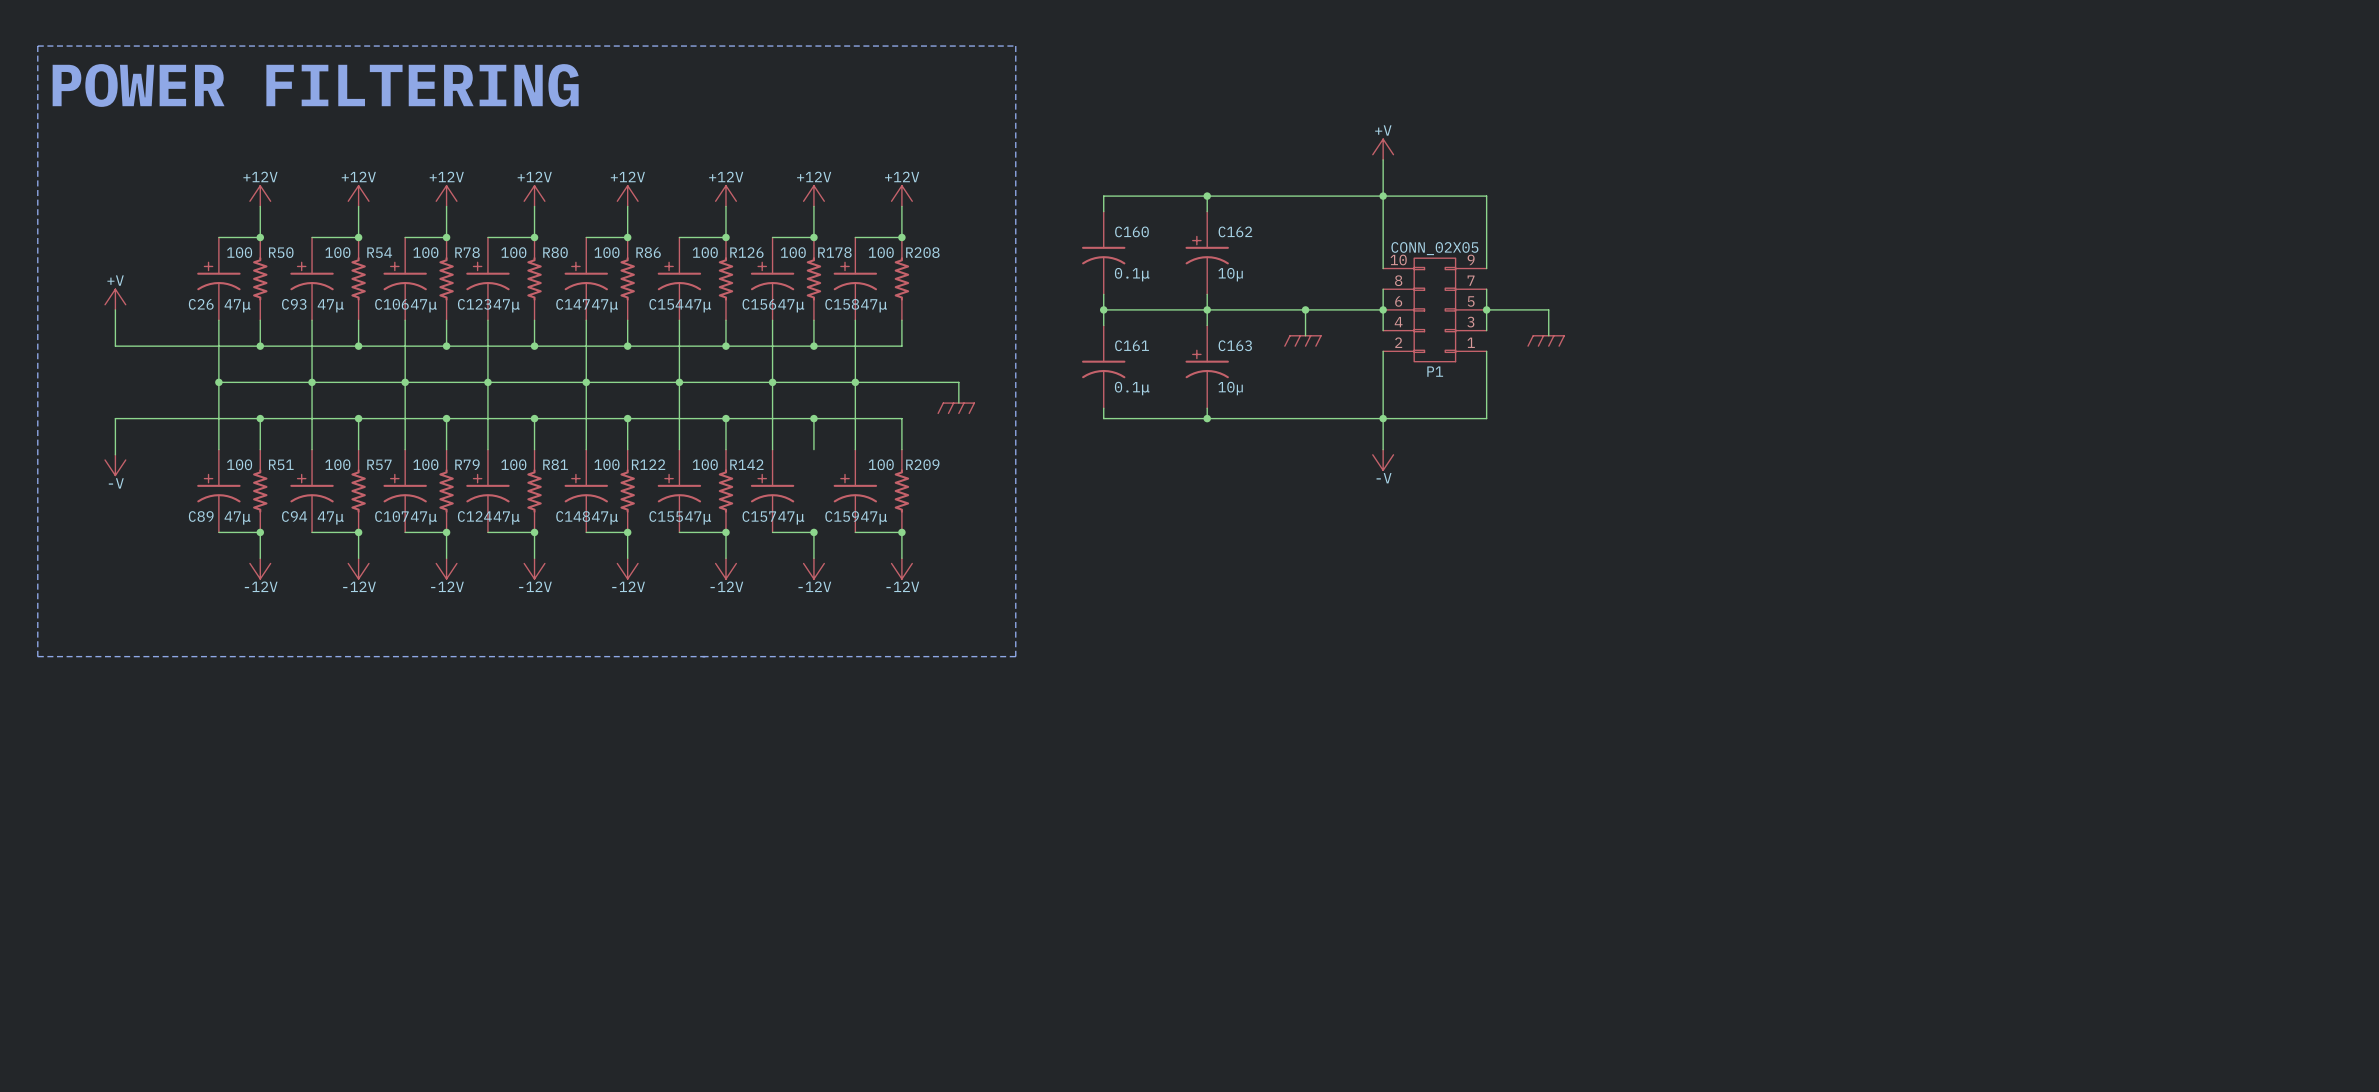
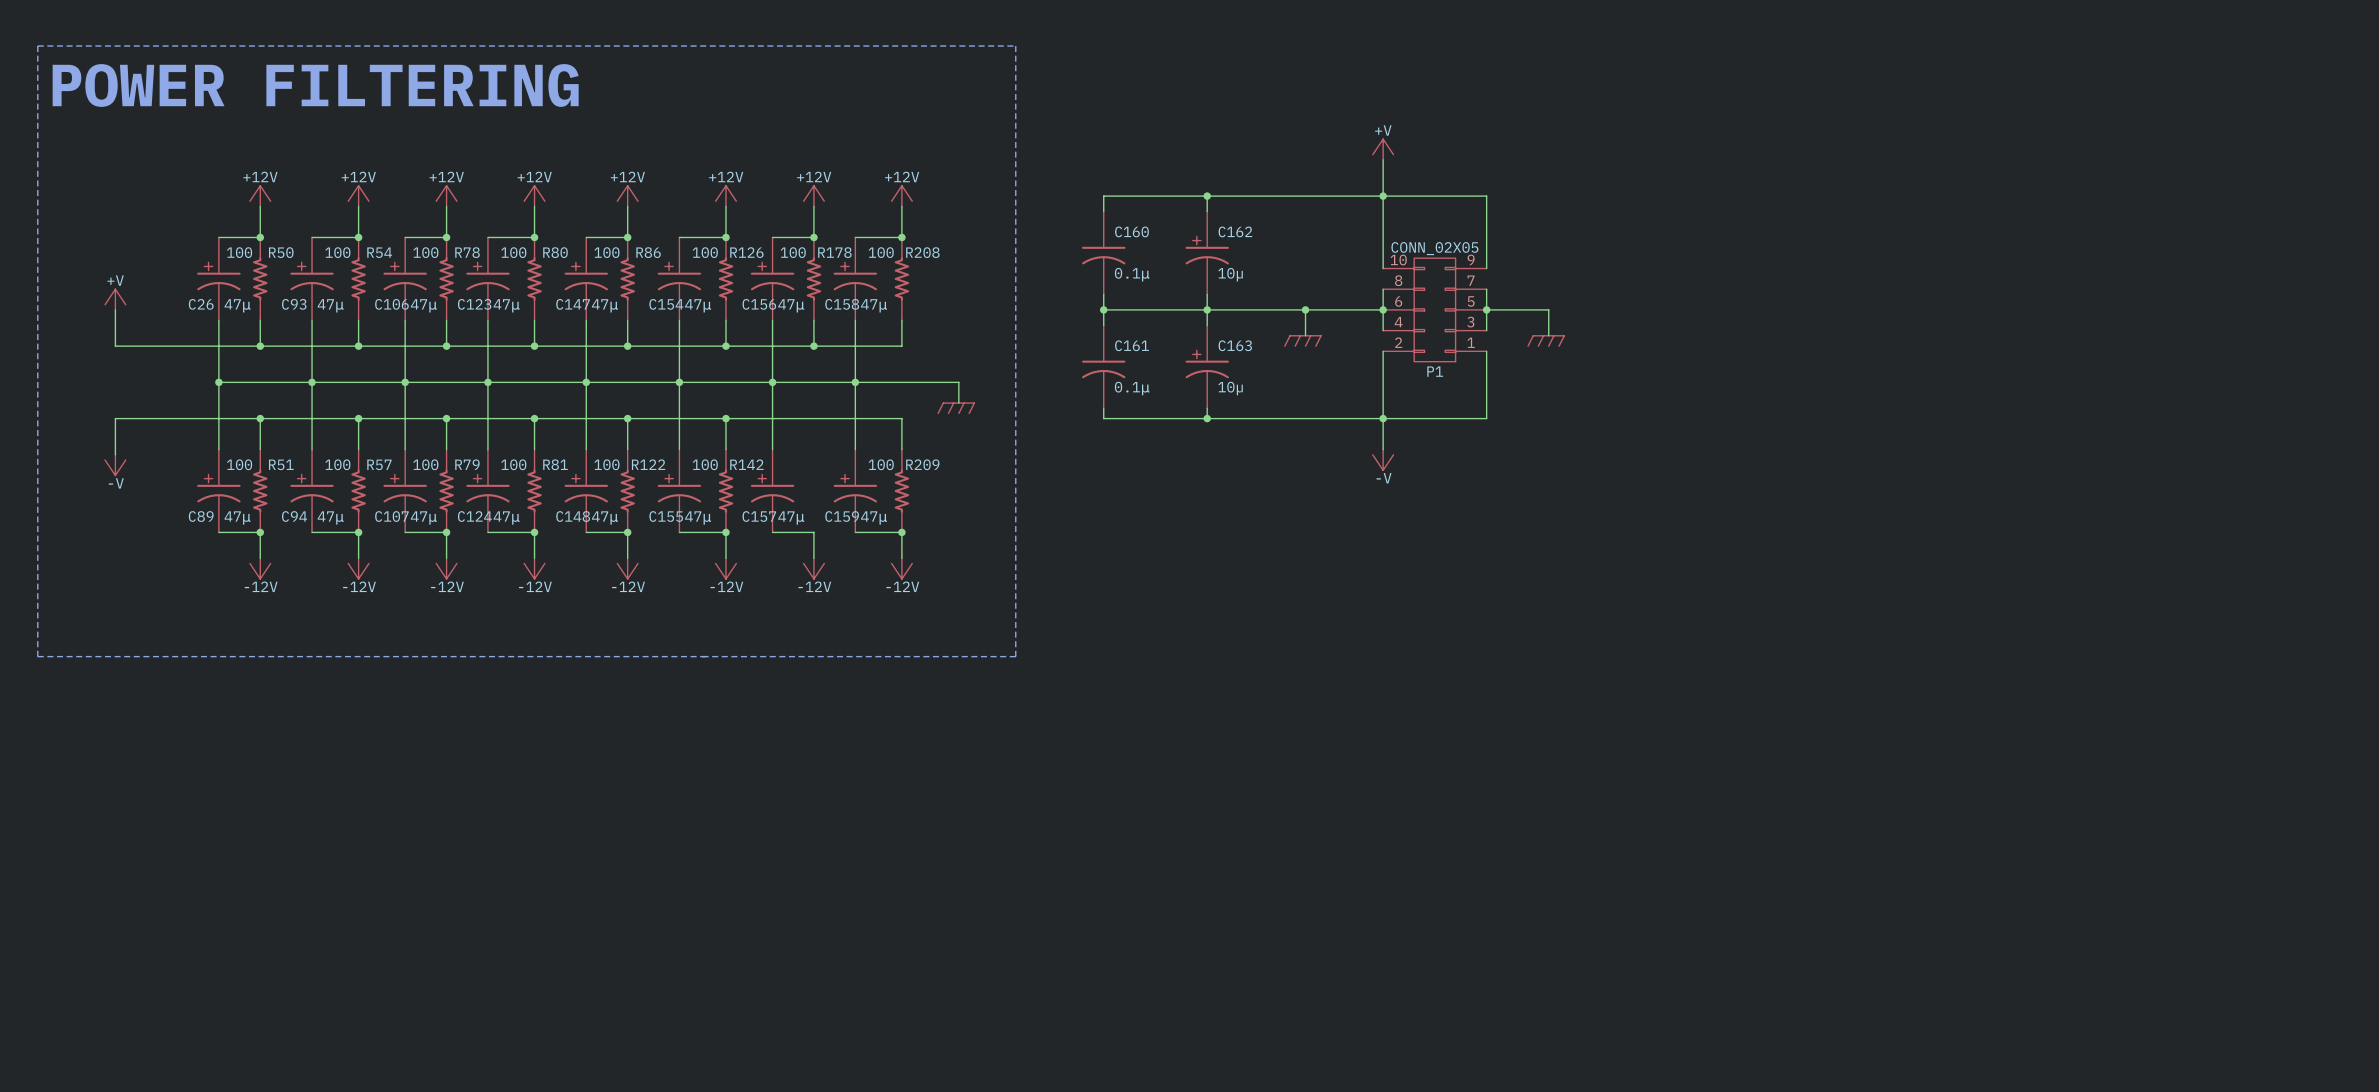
wire: (813, 418) (813, 449) -> none
junction: (813, 418) -> none
junction: (813, 532) -> none

